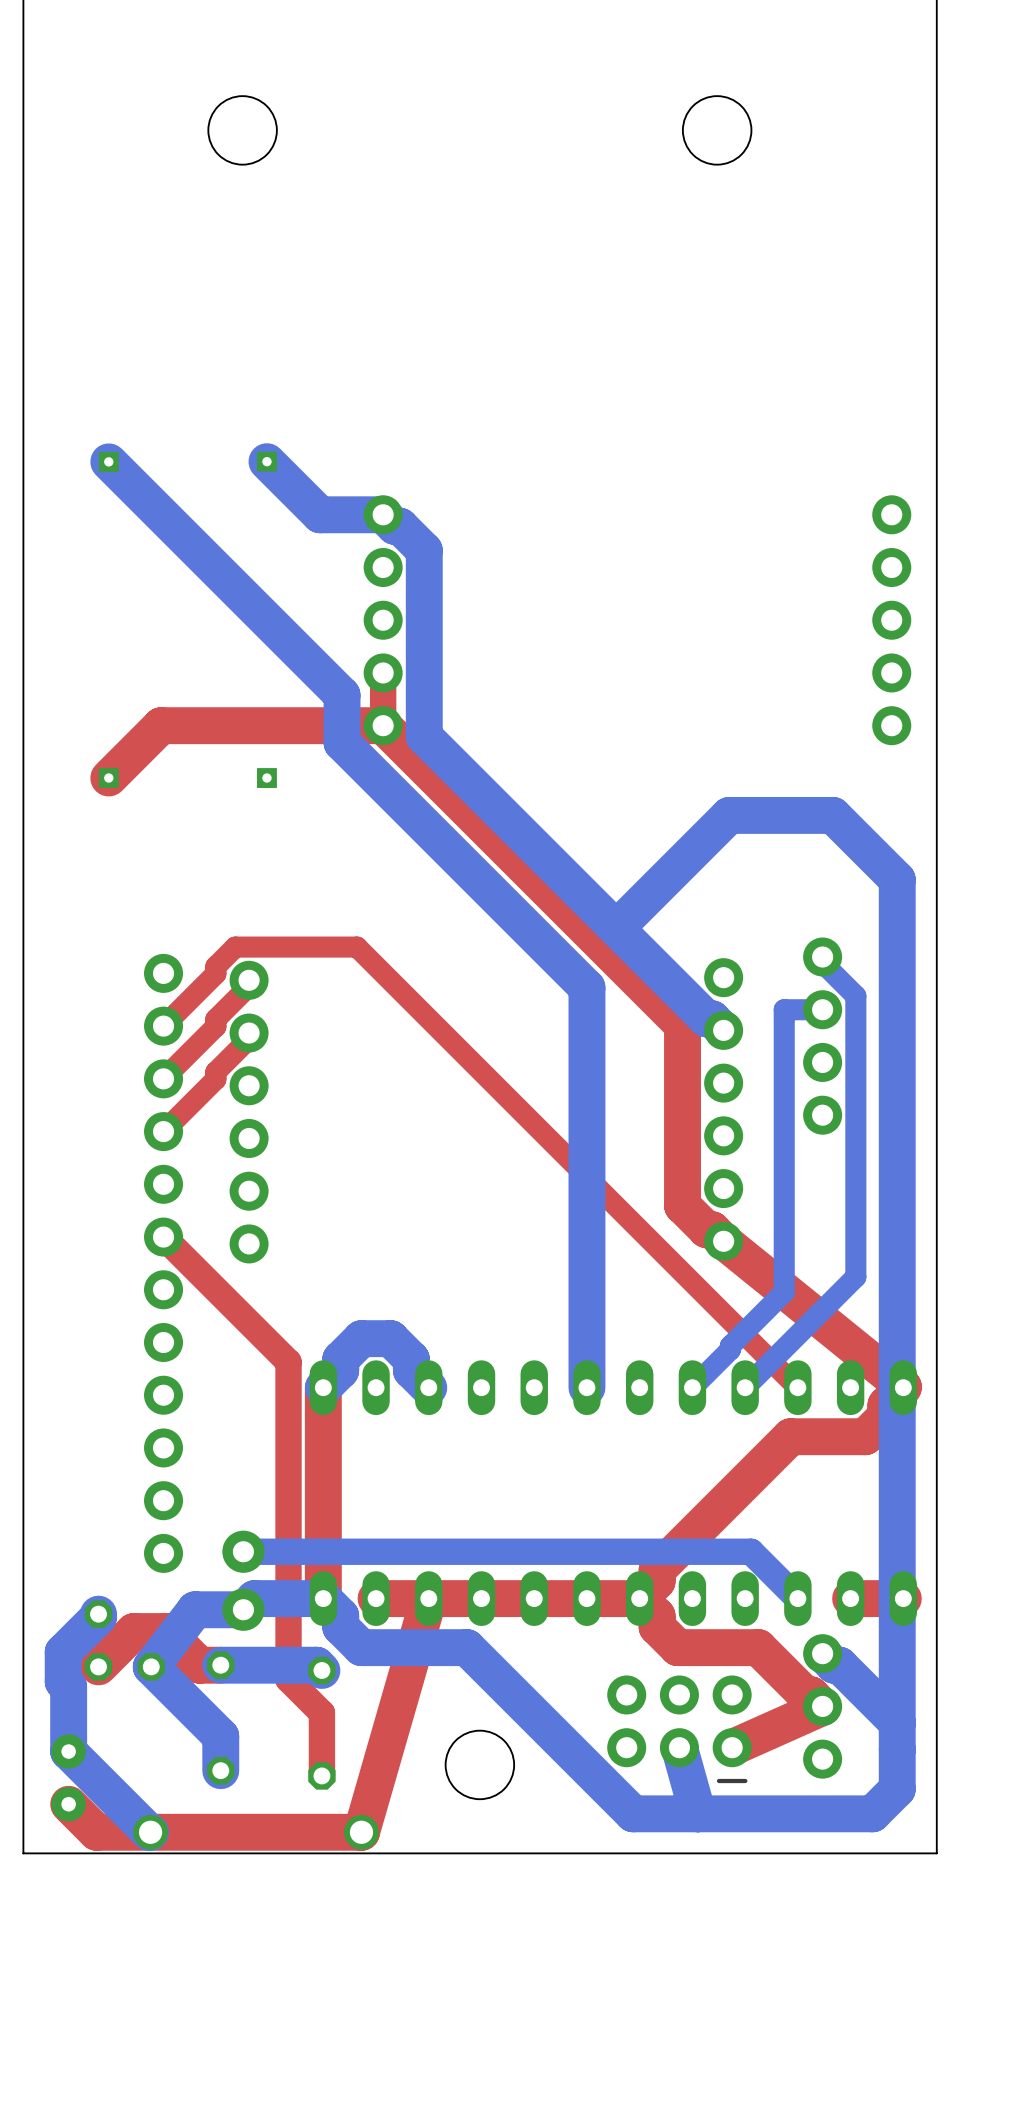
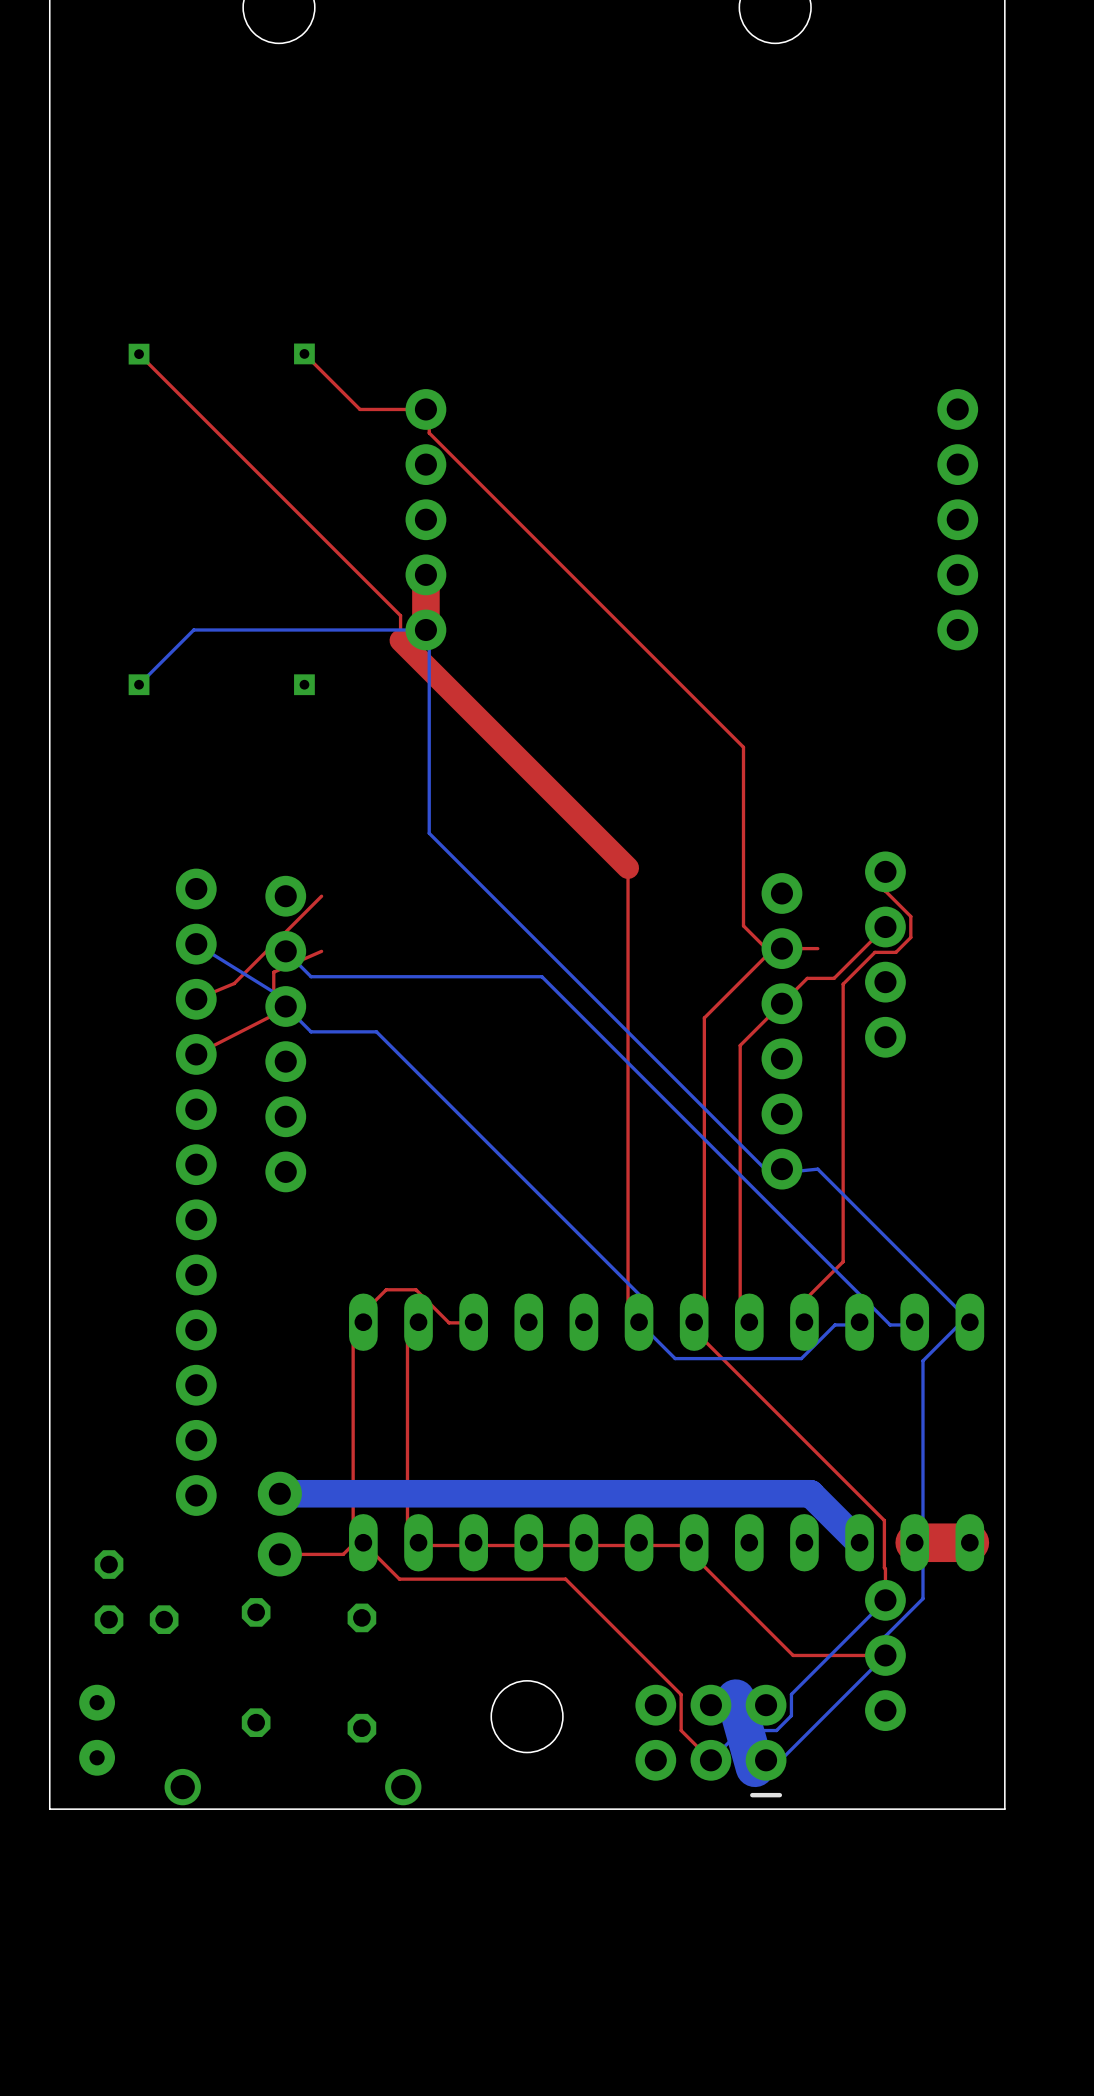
top track: none -> (139, 354) (400, 615) (400, 640) (628, 867) (628, 1324)
bottom track: (108, 461) (342, 695) (342, 742) (586, 987) (586, 1387) -> none
top track: none -> (304, 353) (359, 409) (425, 409) (429, 416) (429, 433) (743, 747) (743, 925) (769, 952)
bottom track: (266, 461) (320, 514) (383, 514) (394, 526) (400, 526) (424, 550) (424, 736) (706, 1018) (712, 1018) (723, 1030) -> none
top track: (108, 778) (161, 725) (383, 725) (682, 1025) (682, 1205) (706, 1229) (712, 1229) (723, 1241) (903, 1387) -> none
bottom track: none -> (139, 684) (193, 630) (425, 630) (429, 638) (429, 833) (769, 1174) (817, 1169) (958, 1310) (958, 1324) (922, 1360) (922, 1598) (885, 1636) (885, 1655) (780, 1760) (766, 1760)
bottom track: (625, 919) (729, 815) (833, 815) (897, 879) (897, 1789) (872, 1813) (633, 1813) (466, 1647) (361, 1647) (340, 1626) (340, 1616) (323, 1598) (254, 1598) (243, 1609) (195, 1609) (151, 1666) (220, 1736) (220, 1770) -> none
top track: none -> (885, 871) (885, 891) (910, 916) (910, 937) (895, 952) (874, 952) (843, 984) (843, 1261) (793, 1311) (793, 1324)
bottom track: (822, 957) (822, 962) (855, 995) (855, 1277) (745, 1387) -> none
top track: (249, 980) (249, 986) (215, 1019) (215, 1026) (163, 1078) -> (321, 896) (234, 983) (196, 999)
top track: none -> (885, 927) (834, 978) (807, 978) (740, 1045) (740, 1322) (738, 1324)
bottom track: (822, 1009) (784, 1009) (784, 1292) (730, 1346) (730, 1349) (692, 1387) -> none
top track: (163, 1026) (215, 973) (215, 966) (235, 947) (357, 947) (797, 1387) -> none
bottom track: none -> (196, 944) (296, 1006) (296, 1017) (311, 1031) (376, 1031) (647, 1302) (647, 1330) (675, 1358) (801, 1358) (835, 1324) (848, 1324)
top track: none -> (817, 948) (773, 948) (704, 1017) (704, 1340) (884, 1520) (885, 1600)
bottom track: none -> (296, 950) (296, 961) (311, 976) (541, 976) (890, 1324) (903, 1324)
top track: (249, 1033) (249, 1038) (215, 1071) (215, 1079) (163, 1131) -> (321, 951) (273, 972) (273, 1014) (196, 1054)
top track: (163, 1237) (288, 1362) (288, 1679) (321, 1712) (321, 1775) -> none
top track: (323, 1387) (323, 1598) -> none
bottom track: (428, 1387) (411, 1370) (411, 1359) (390, 1338) (361, 1338) (340, 1359) (340, 1370) (323, 1387) -> none
top track: none -> (407, 1324) (407, 1545) (683, 1545) (793, 1655) (885, 1655)
top track: none -> (462, 1324) (462, 1322) (449, 1322) (416, 1289) (386, 1289) (353, 1322) (353, 1544)
top track: (897, 1393) (885, 1405) (885, 1416) (865, 1436) (790, 1436) (657, 1570) (657, 1581) (639, 1598) -> none
top track: (428, 1598) (361, 1832) (96, 1832) (68, 1804) -> none
top track: (639, 1598) (376, 1598) -> none
top track: (639, 1598) (657, 1616) (657, 1626) (677, 1647) (758, 1647) (805, 1694) (811, 1694) (822, 1706) (732, 1747) -> none
top track: none -> (353, 1544) (365, 1545) (399, 1579) (565, 1579) (681, 1694) (681, 1730) (710, 1760)
top track: none -> (353, 1544) (343, 1554) (279, 1554)
bottom track: (98, 1614) (98, 1616) (63, 1652) (63, 1681) (68, 1686) (68, 1751) (150, 1832) -> none
part position: (124, 1640) -> (136, 1592)
bottom track: (822, 1653) (834, 1665) (839, 1665) (897, 1722) -> (885, 1600) (791, 1694) (791, 1715) (776, 1730) (740, 1730) (710, 1760)
top track: (220, 1665) (199, 1665) (165, 1631) (133, 1631) (98, 1666) -> none
bottom track: (220, 1665) (316, 1665) (321, 1670) -> none
part position: (679, 1729) -> (710, 1741)

